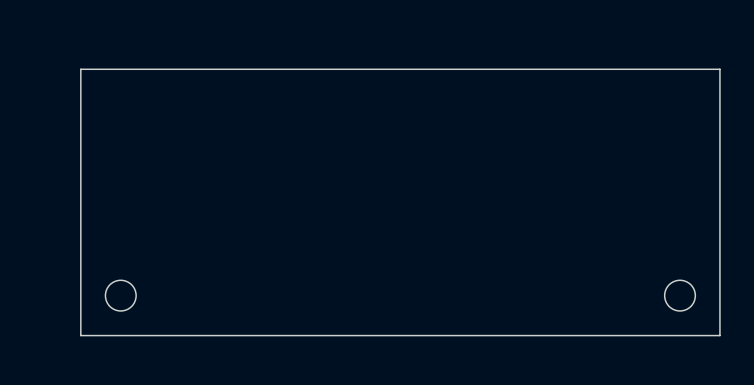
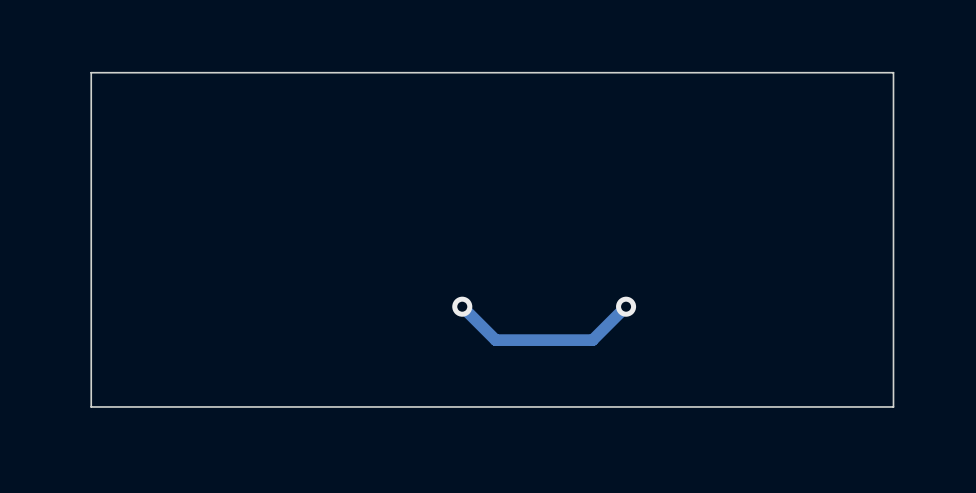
via: none -> (462, 306)
track: none -> (626, 306) (592, 340) (495, 340) (462, 306)
via: none -> (626, 306)
round board edge: [104, 279, 137, 312] -> none
round board edge: [664, 279, 697, 312] -> none

